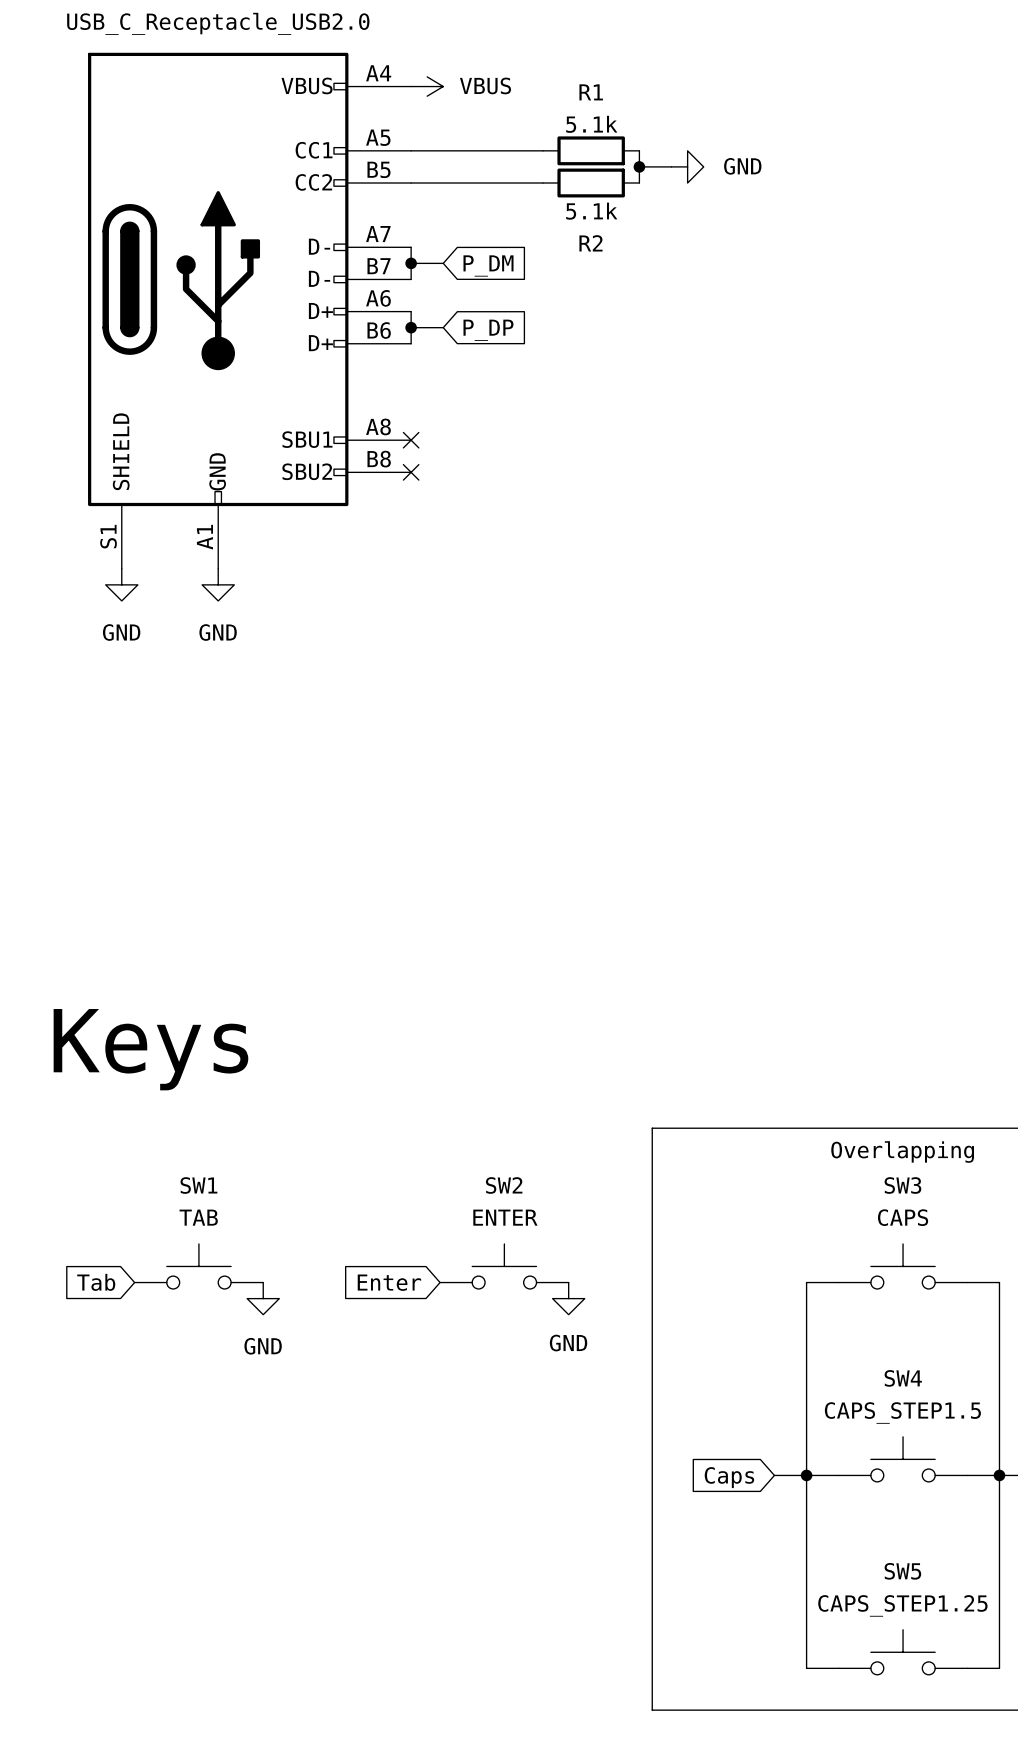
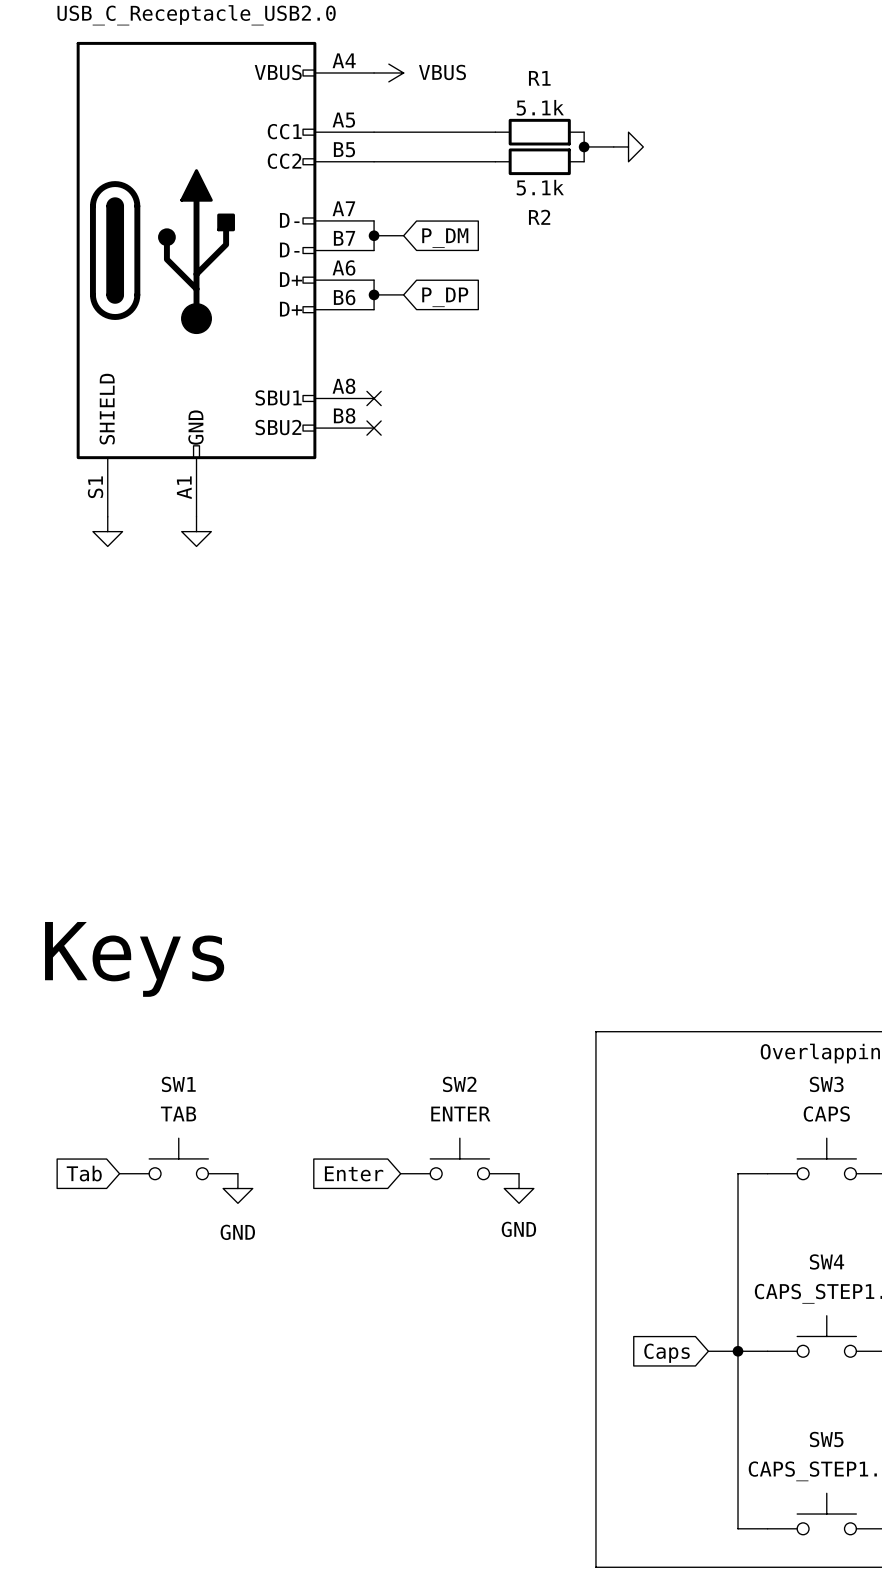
power symbol text: GND (742, 166) -> none
power symbol text: GND (121, 632) -> none
power symbol text: GND (218, 632) -> none

